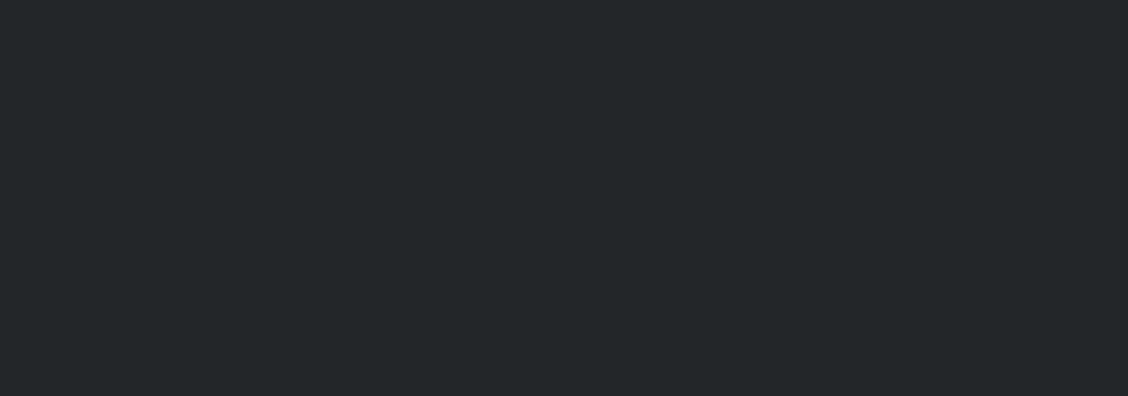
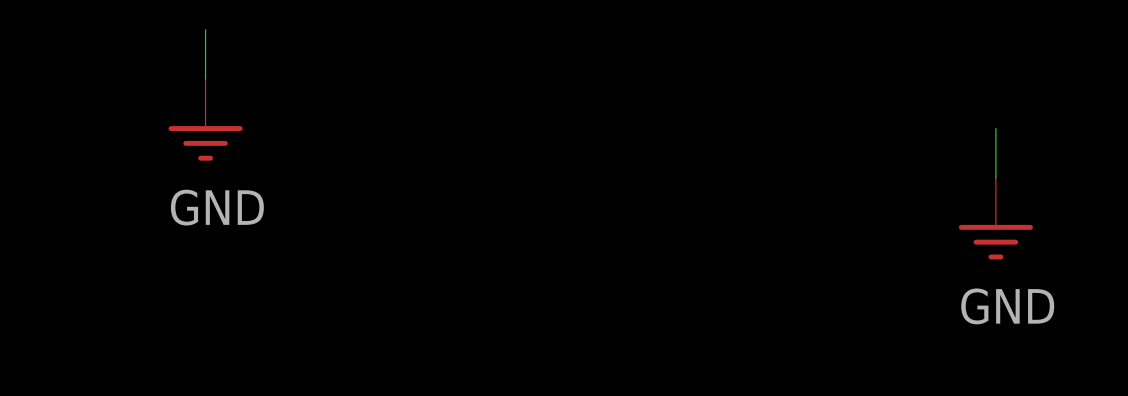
wire: none -> (205, 29) (205, 79)
power symbol: none -> GND (205, 119)
wire: none -> (995, 128) (995, 177)
power symbol: none -> GND (995, 218)

